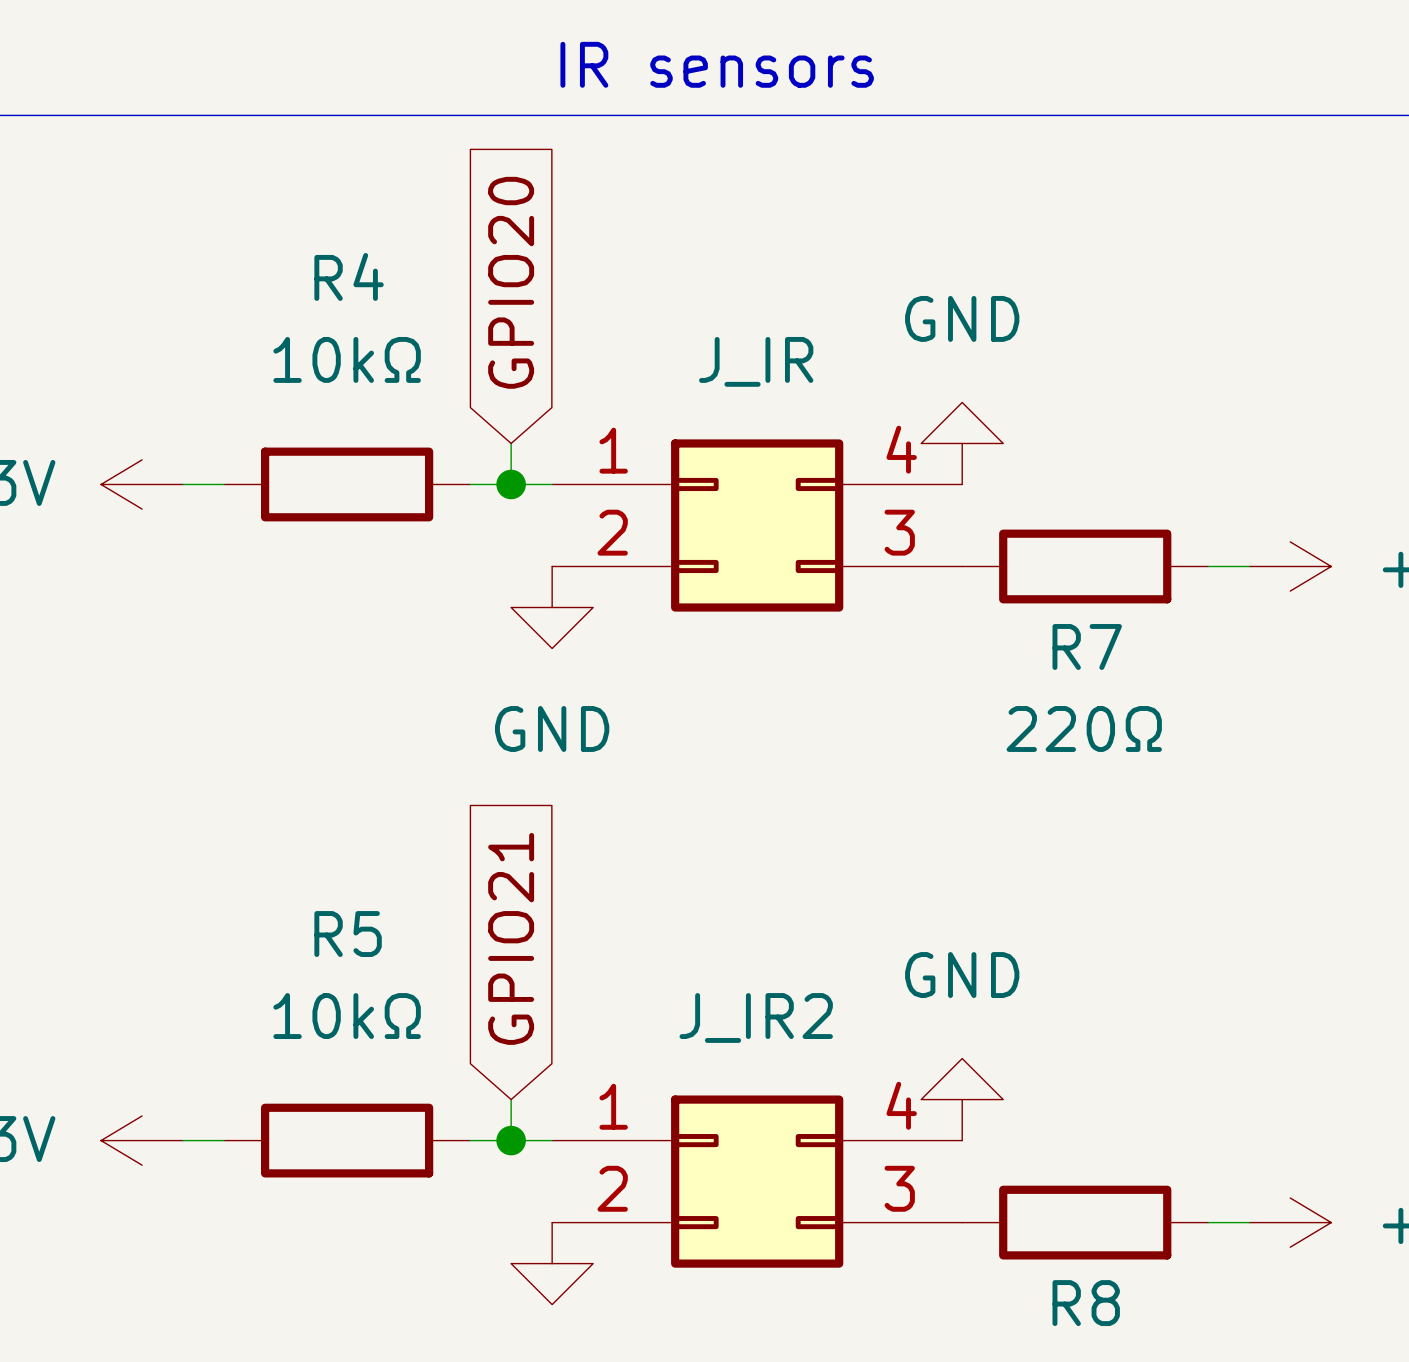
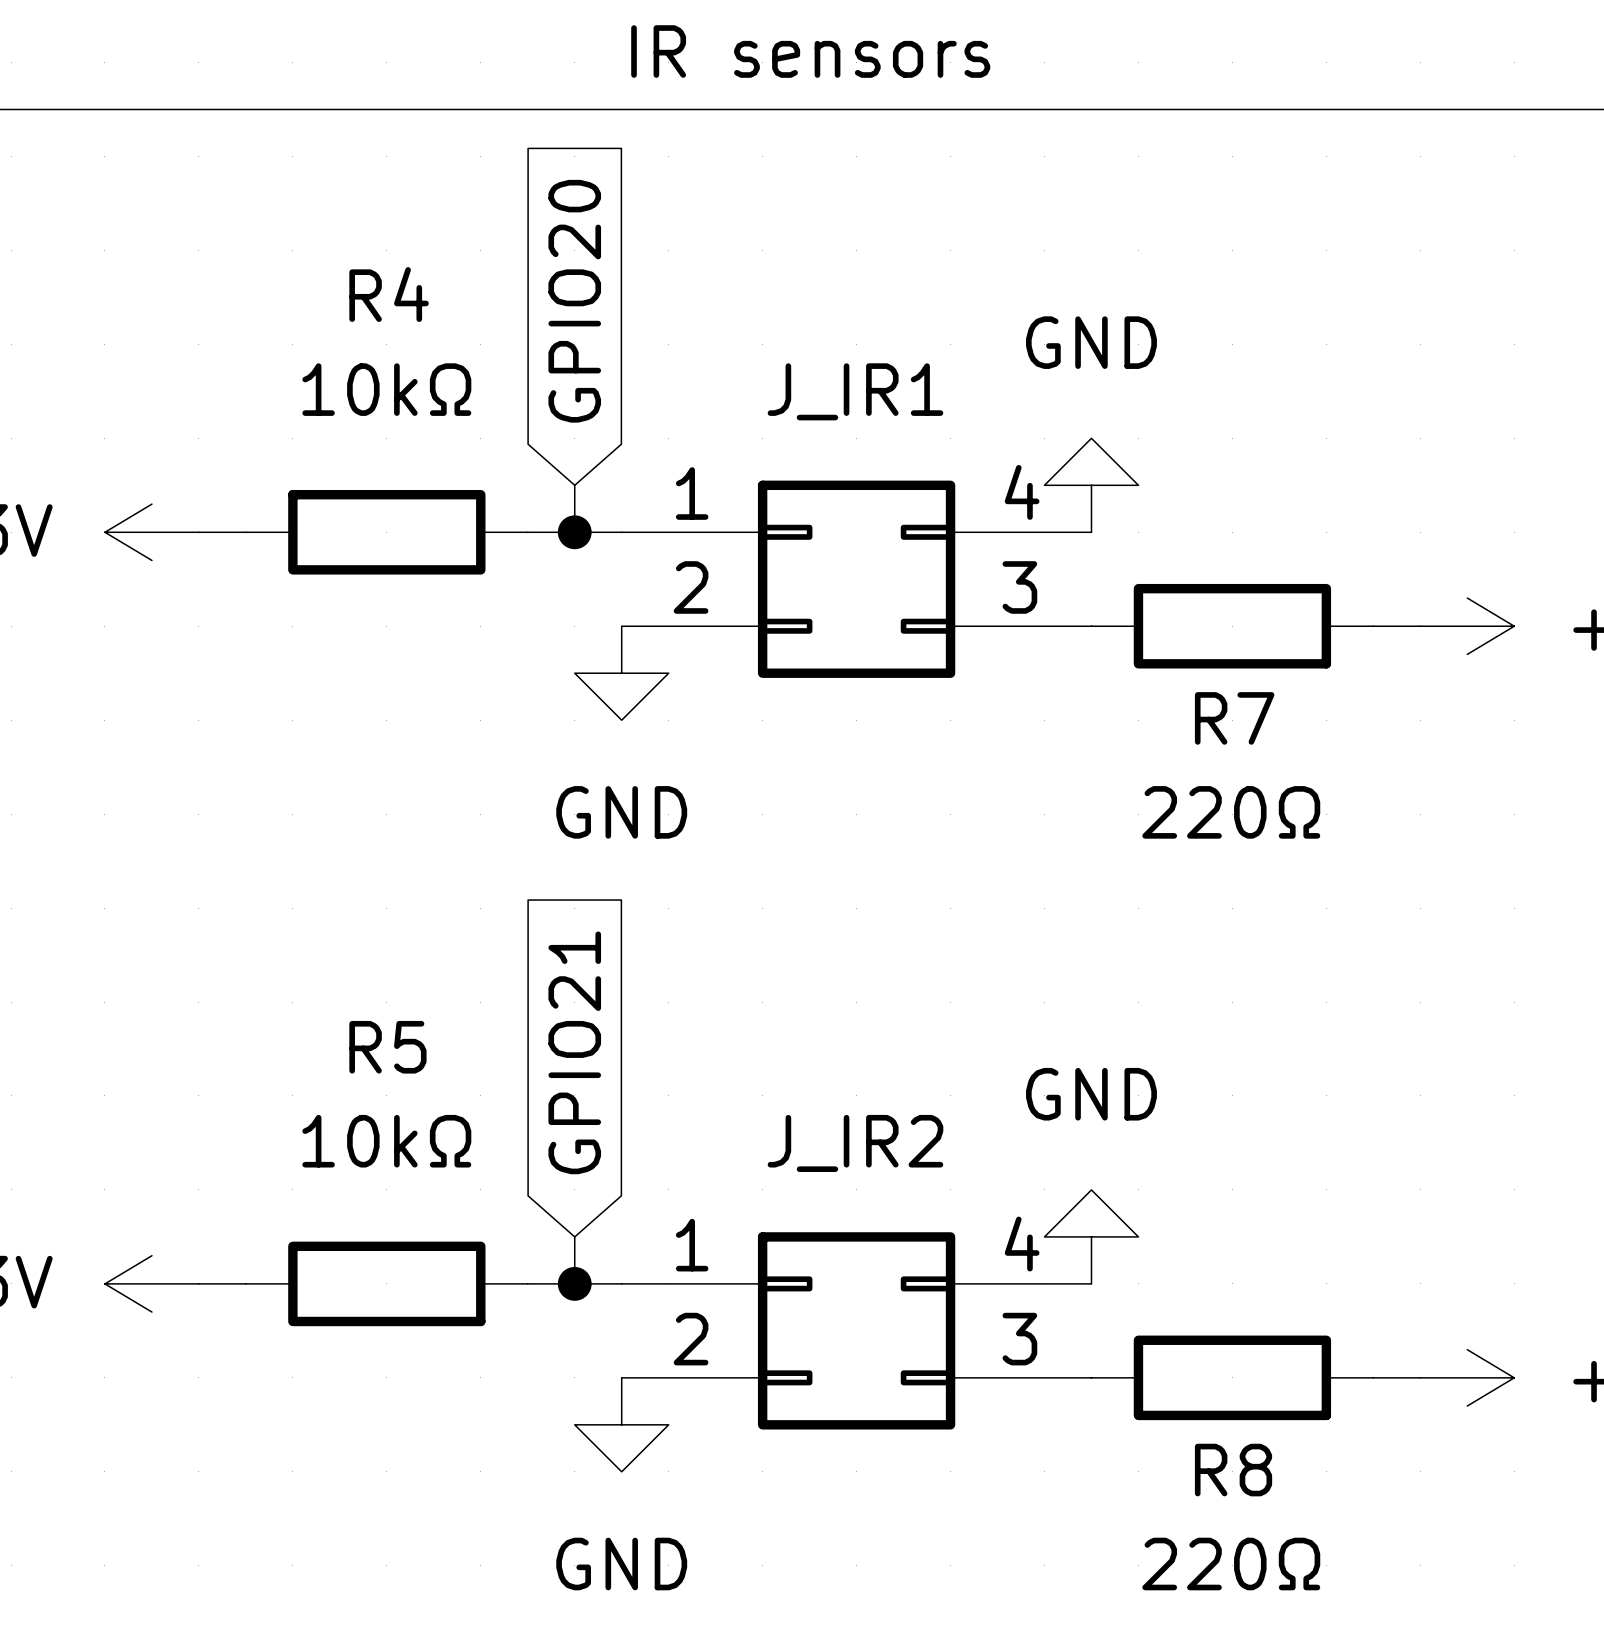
J_IR name: J_IR (756, 361) -> J_IR1 (855, 391)

